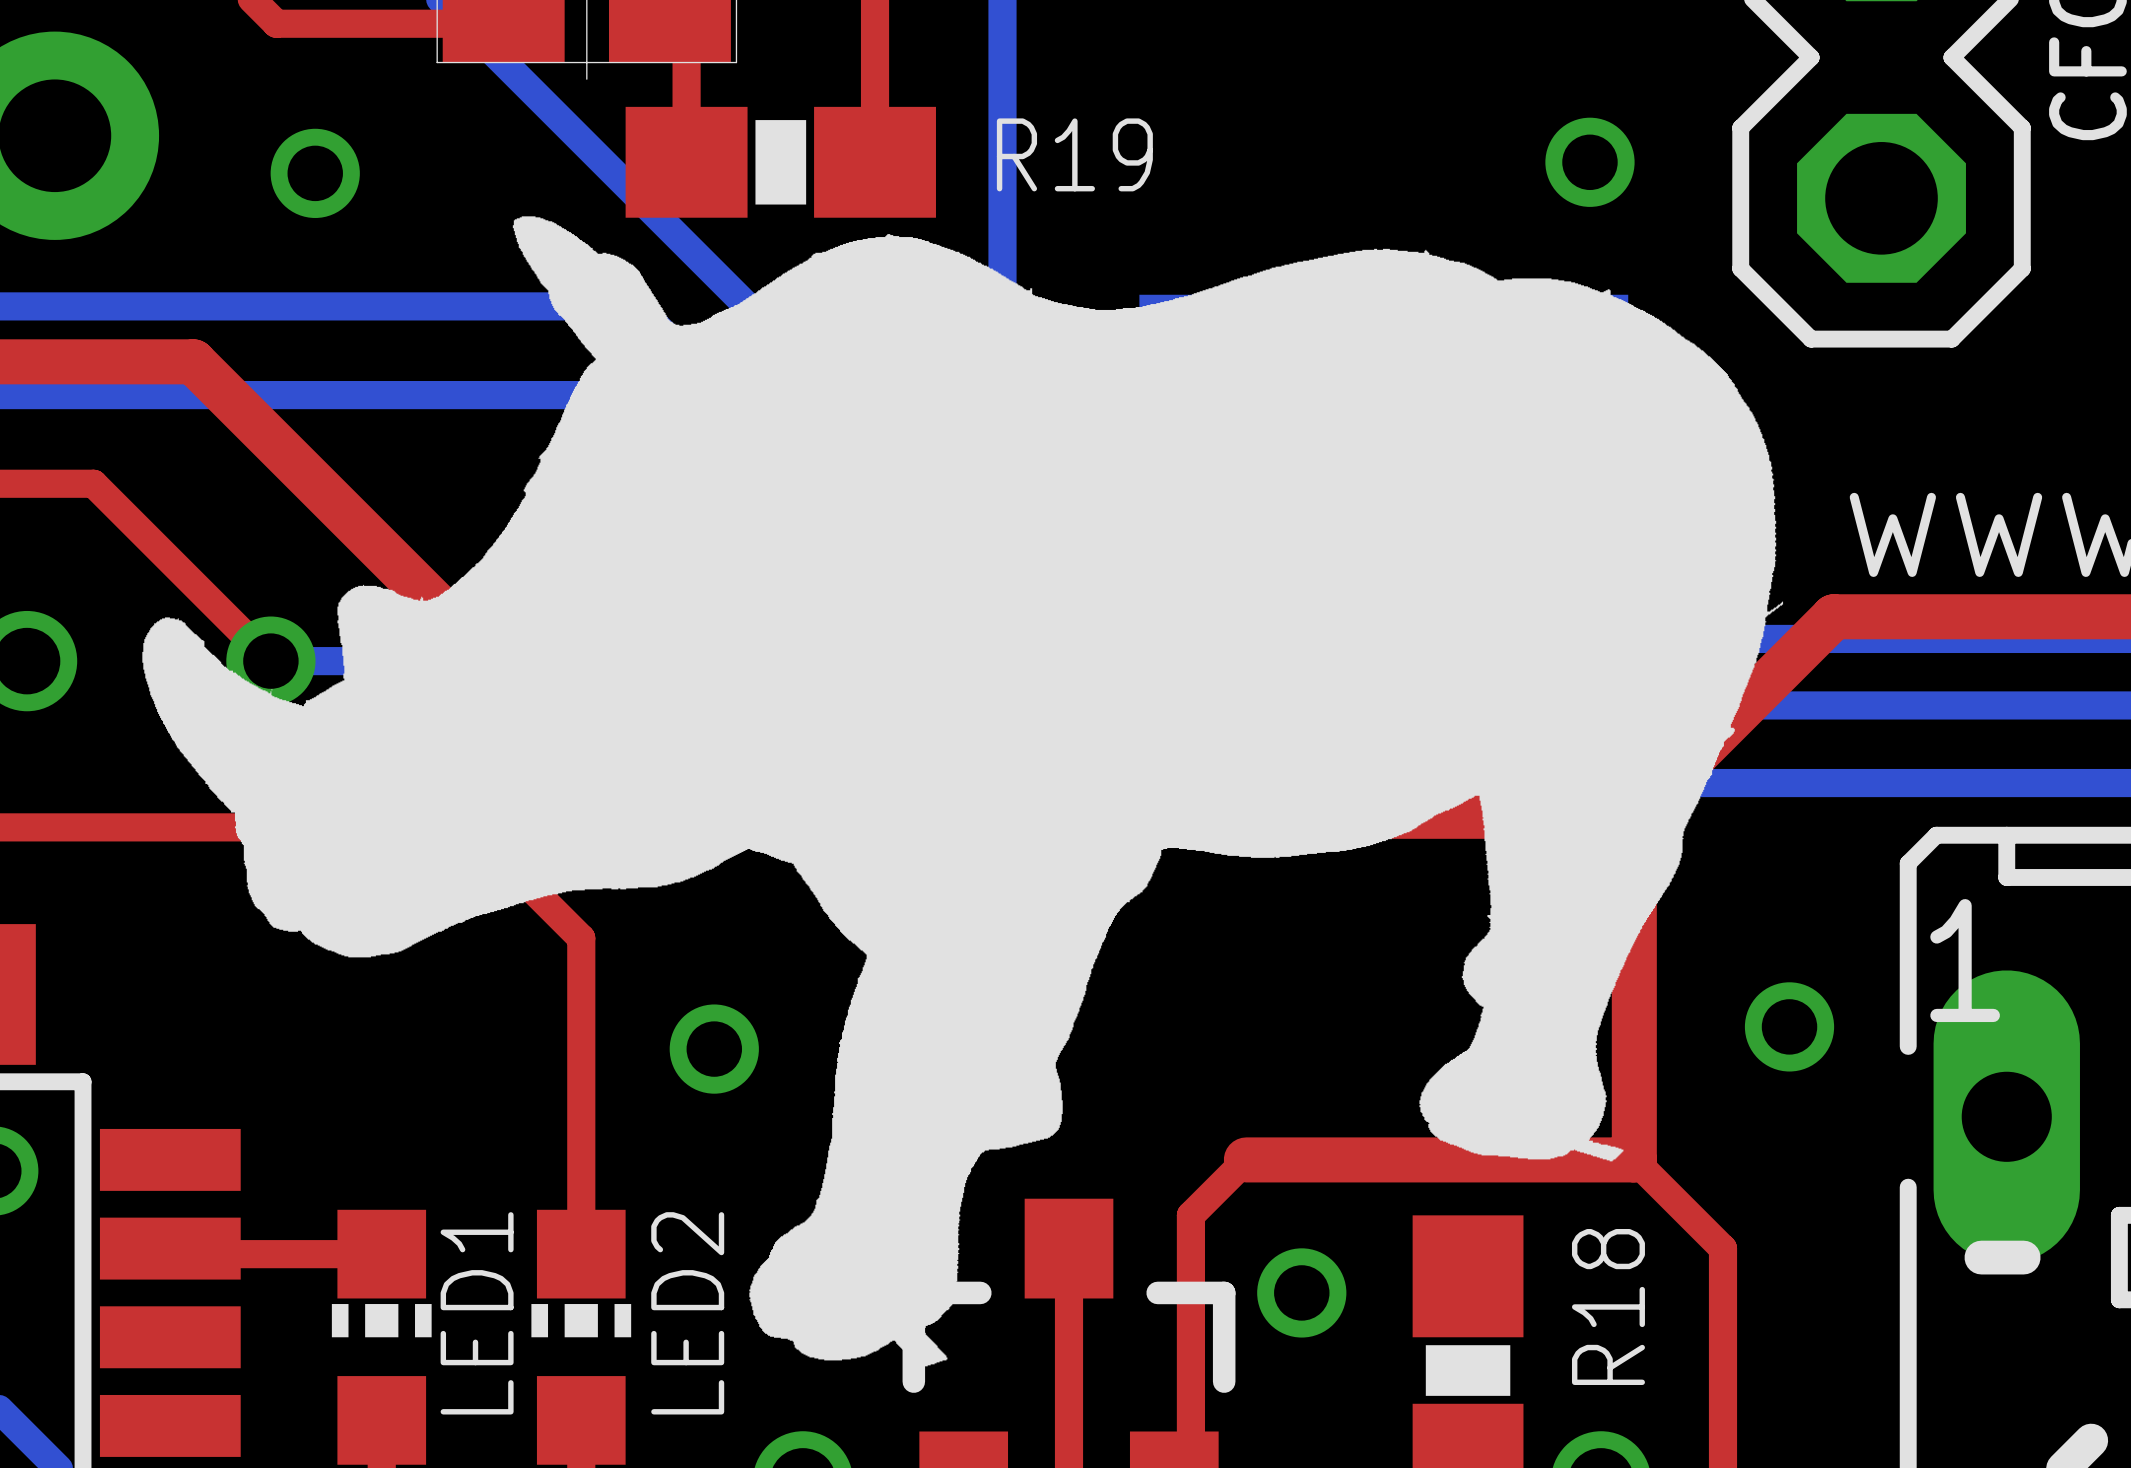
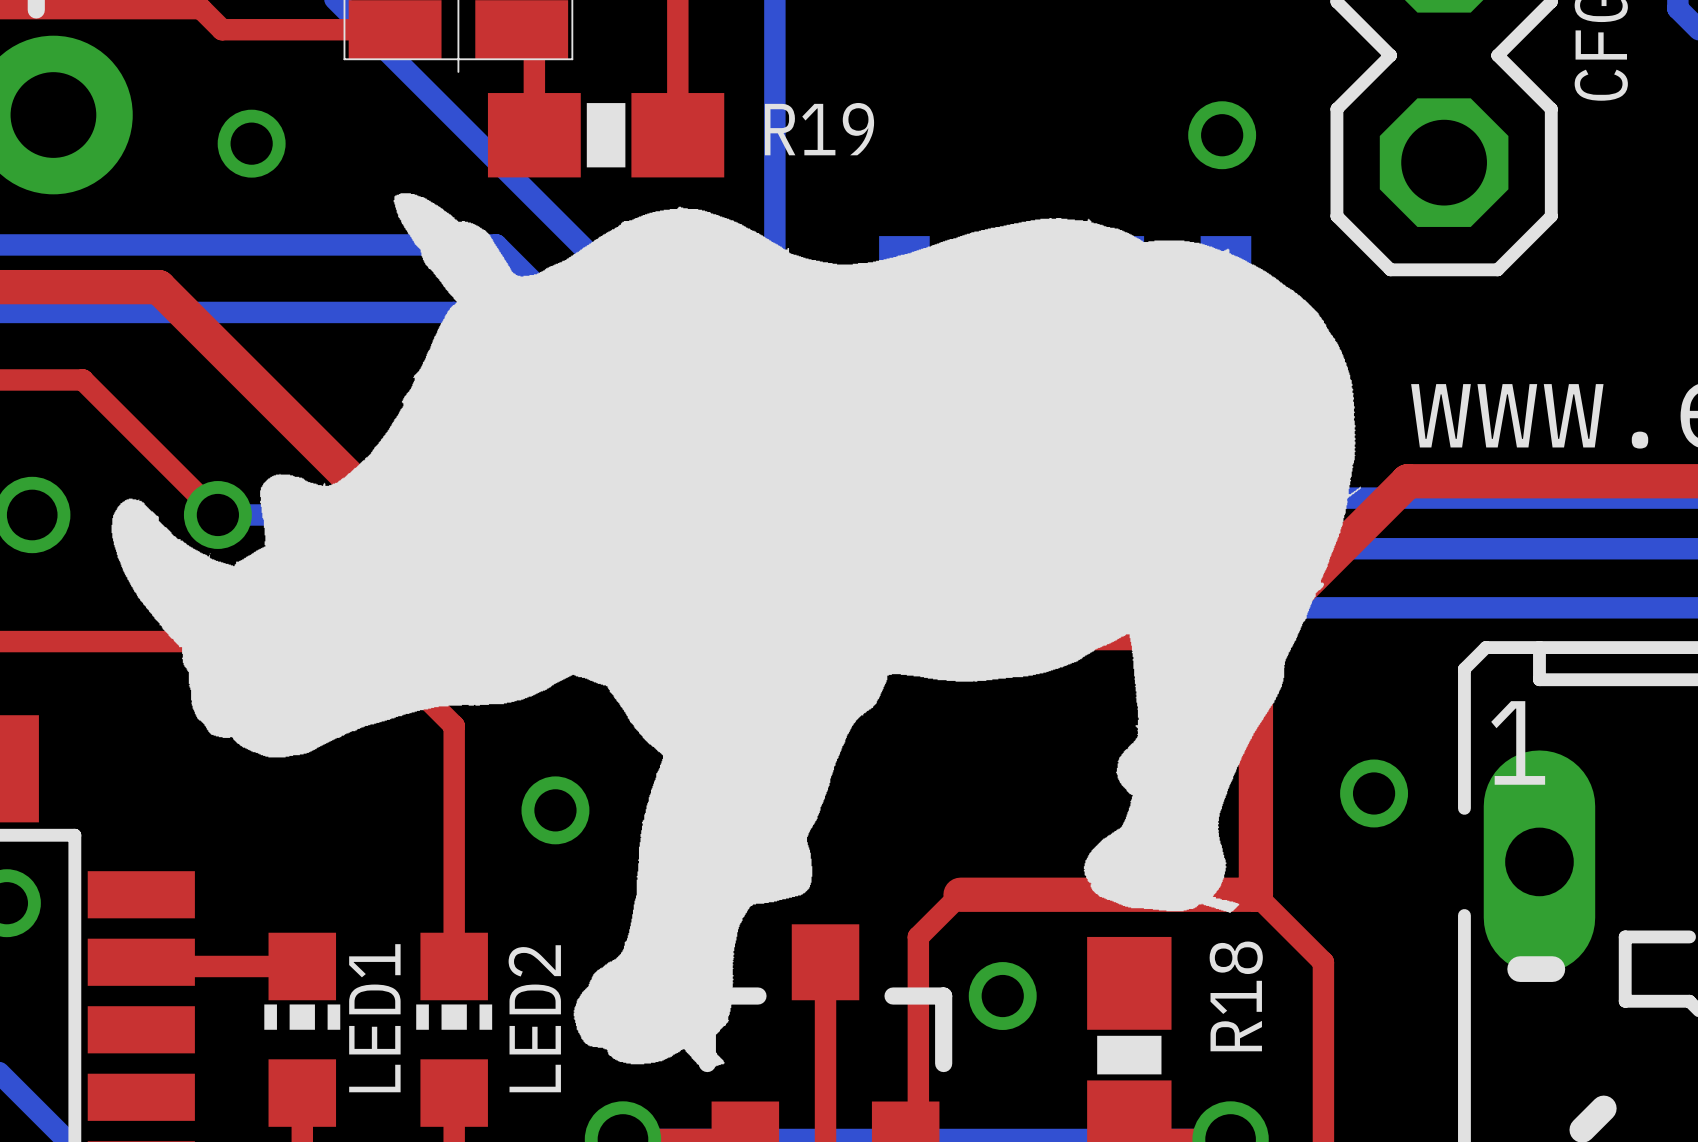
drawing position: (962, 792) -> (736, 631)

